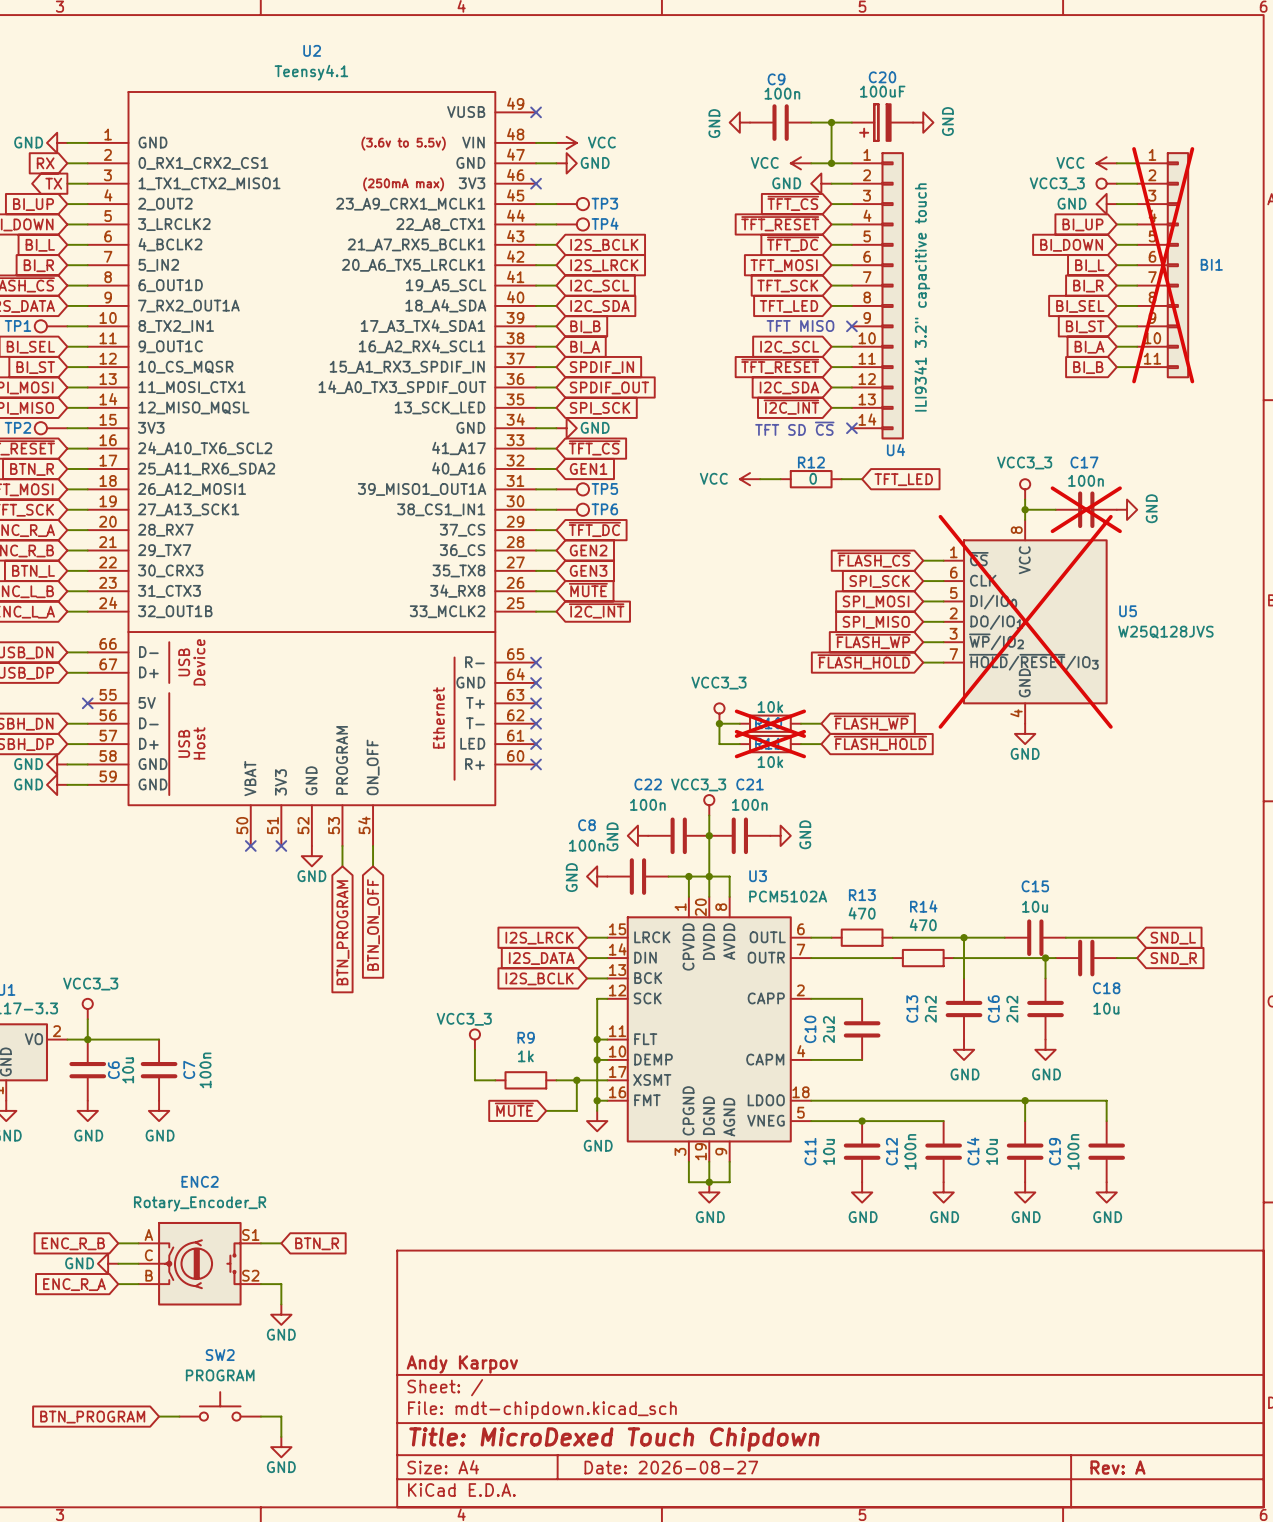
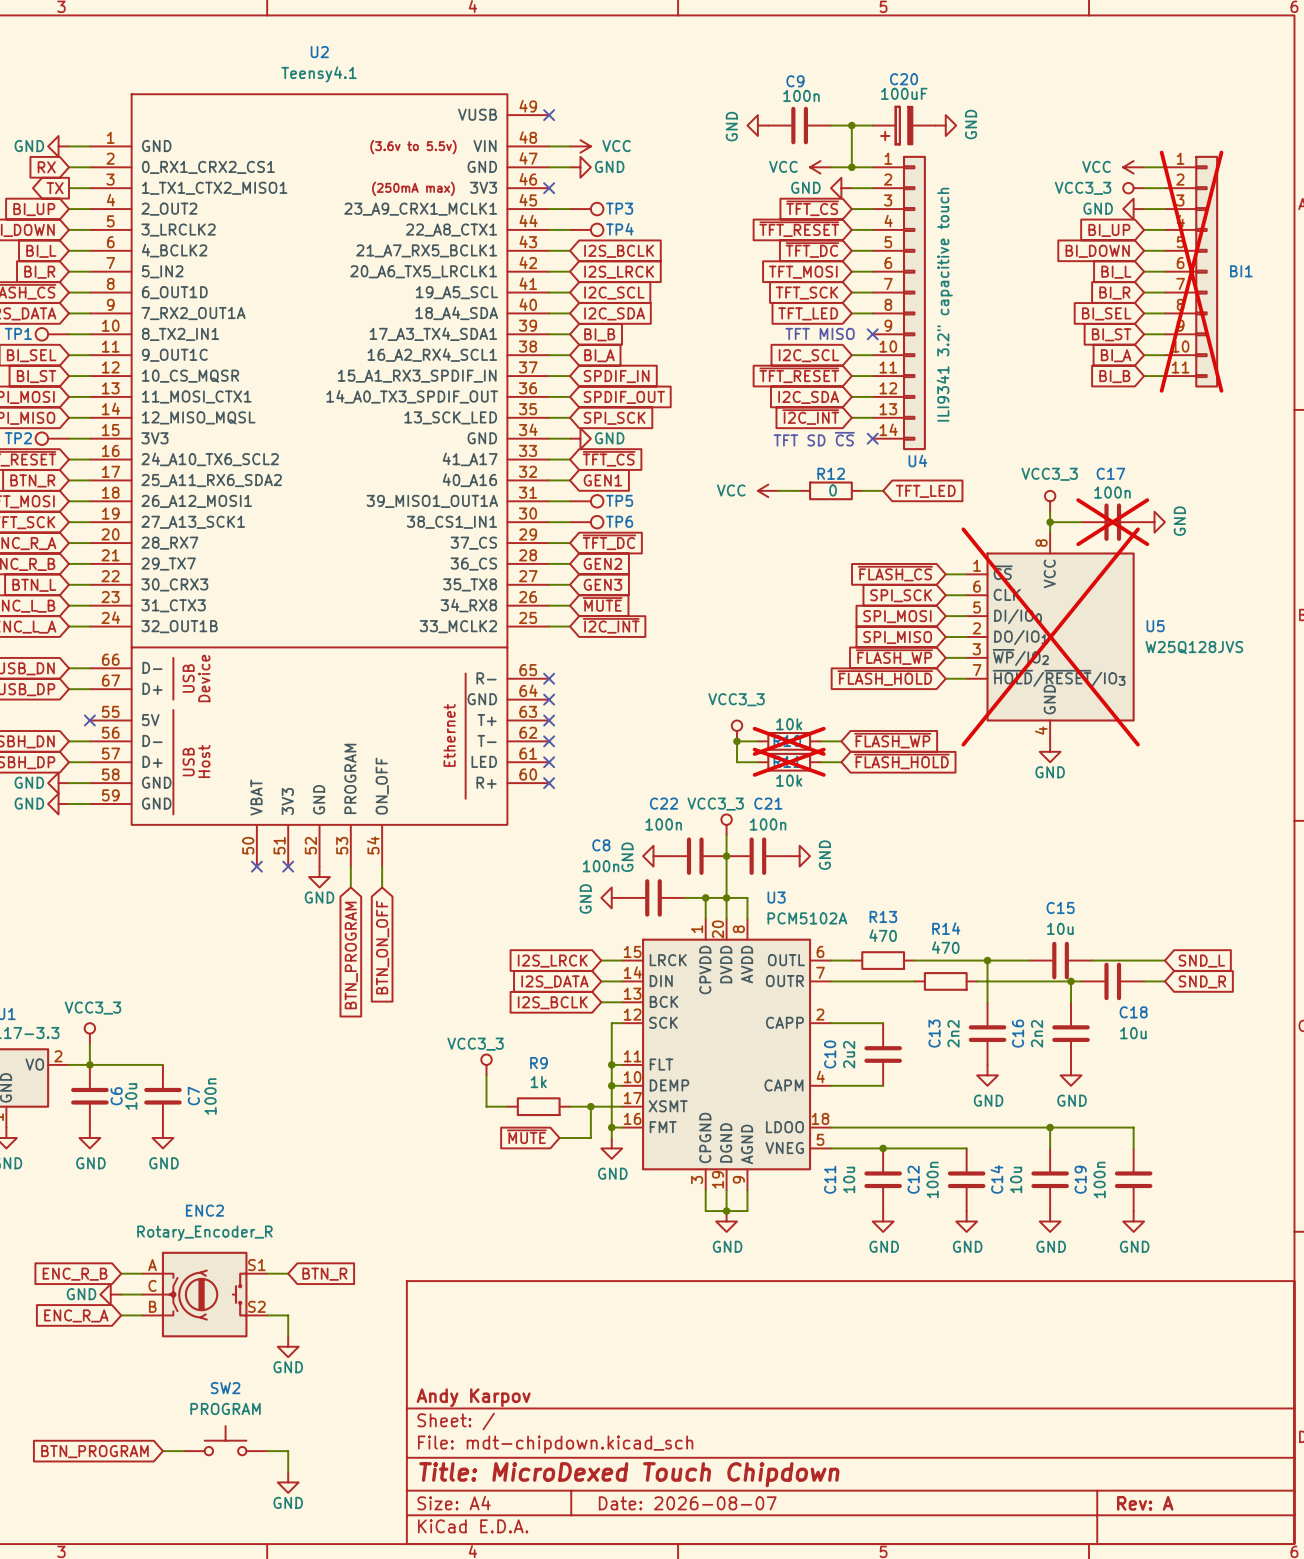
title block: Date: 2026-08-27 (671, 1467) -> Date: 2026-08-07 (687, 1503)

